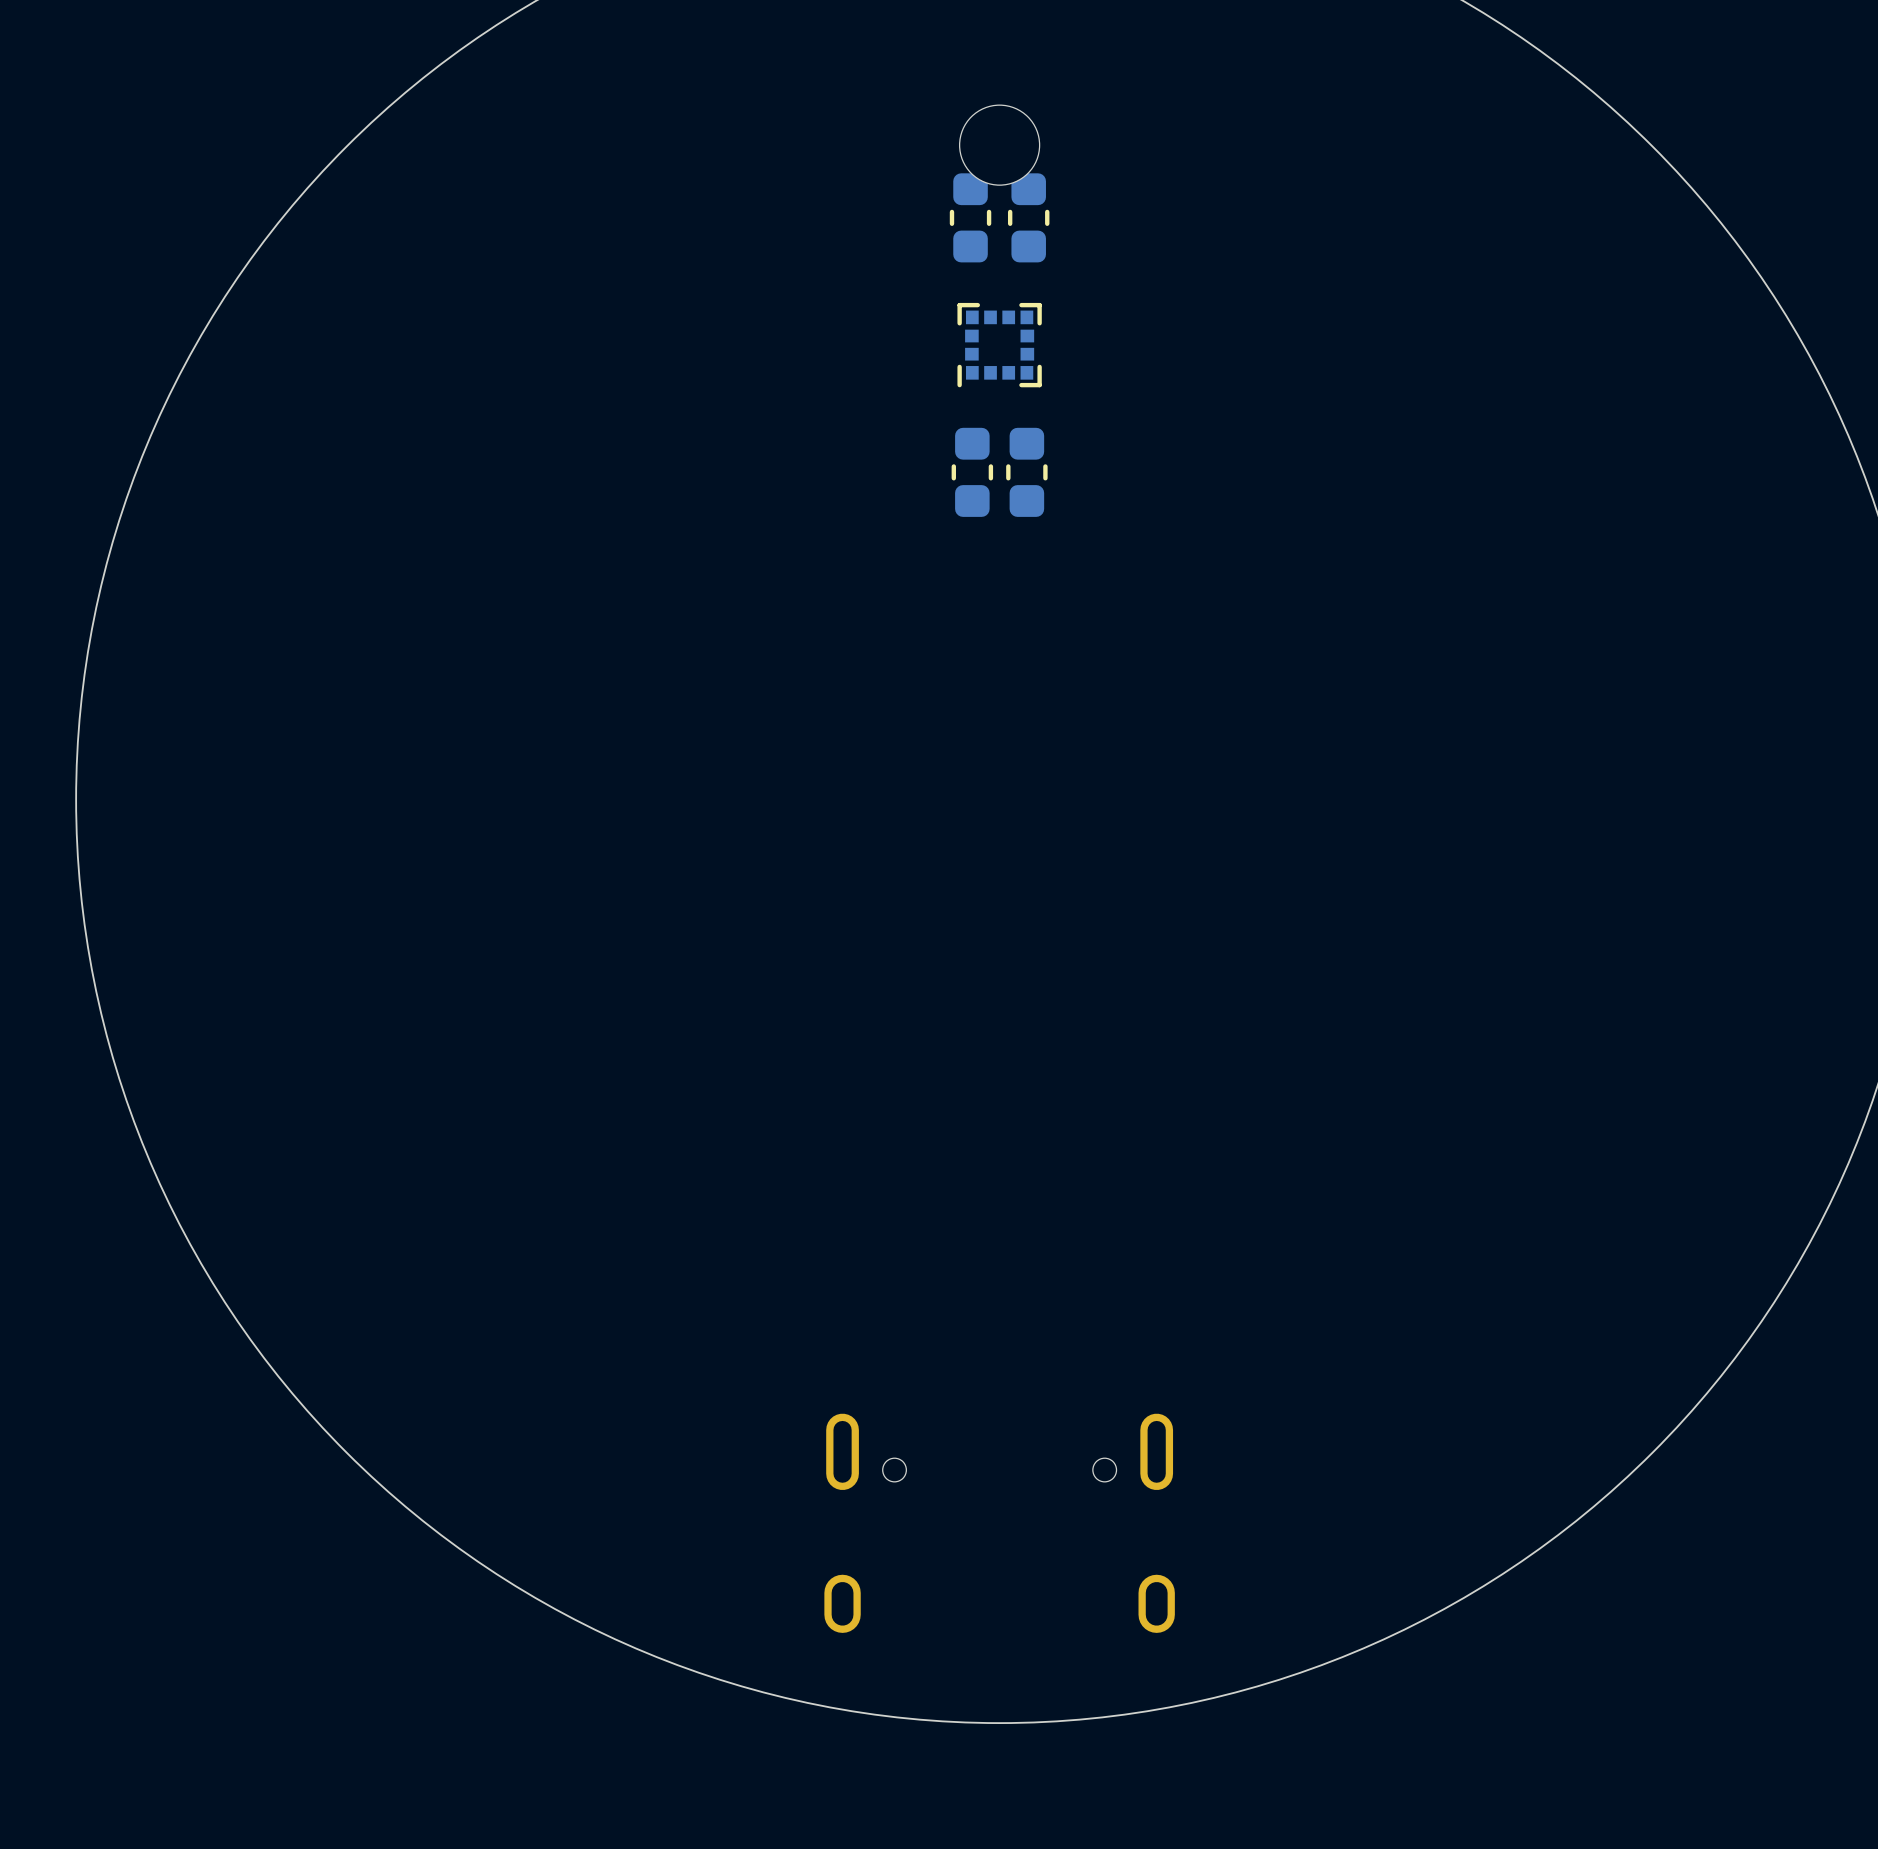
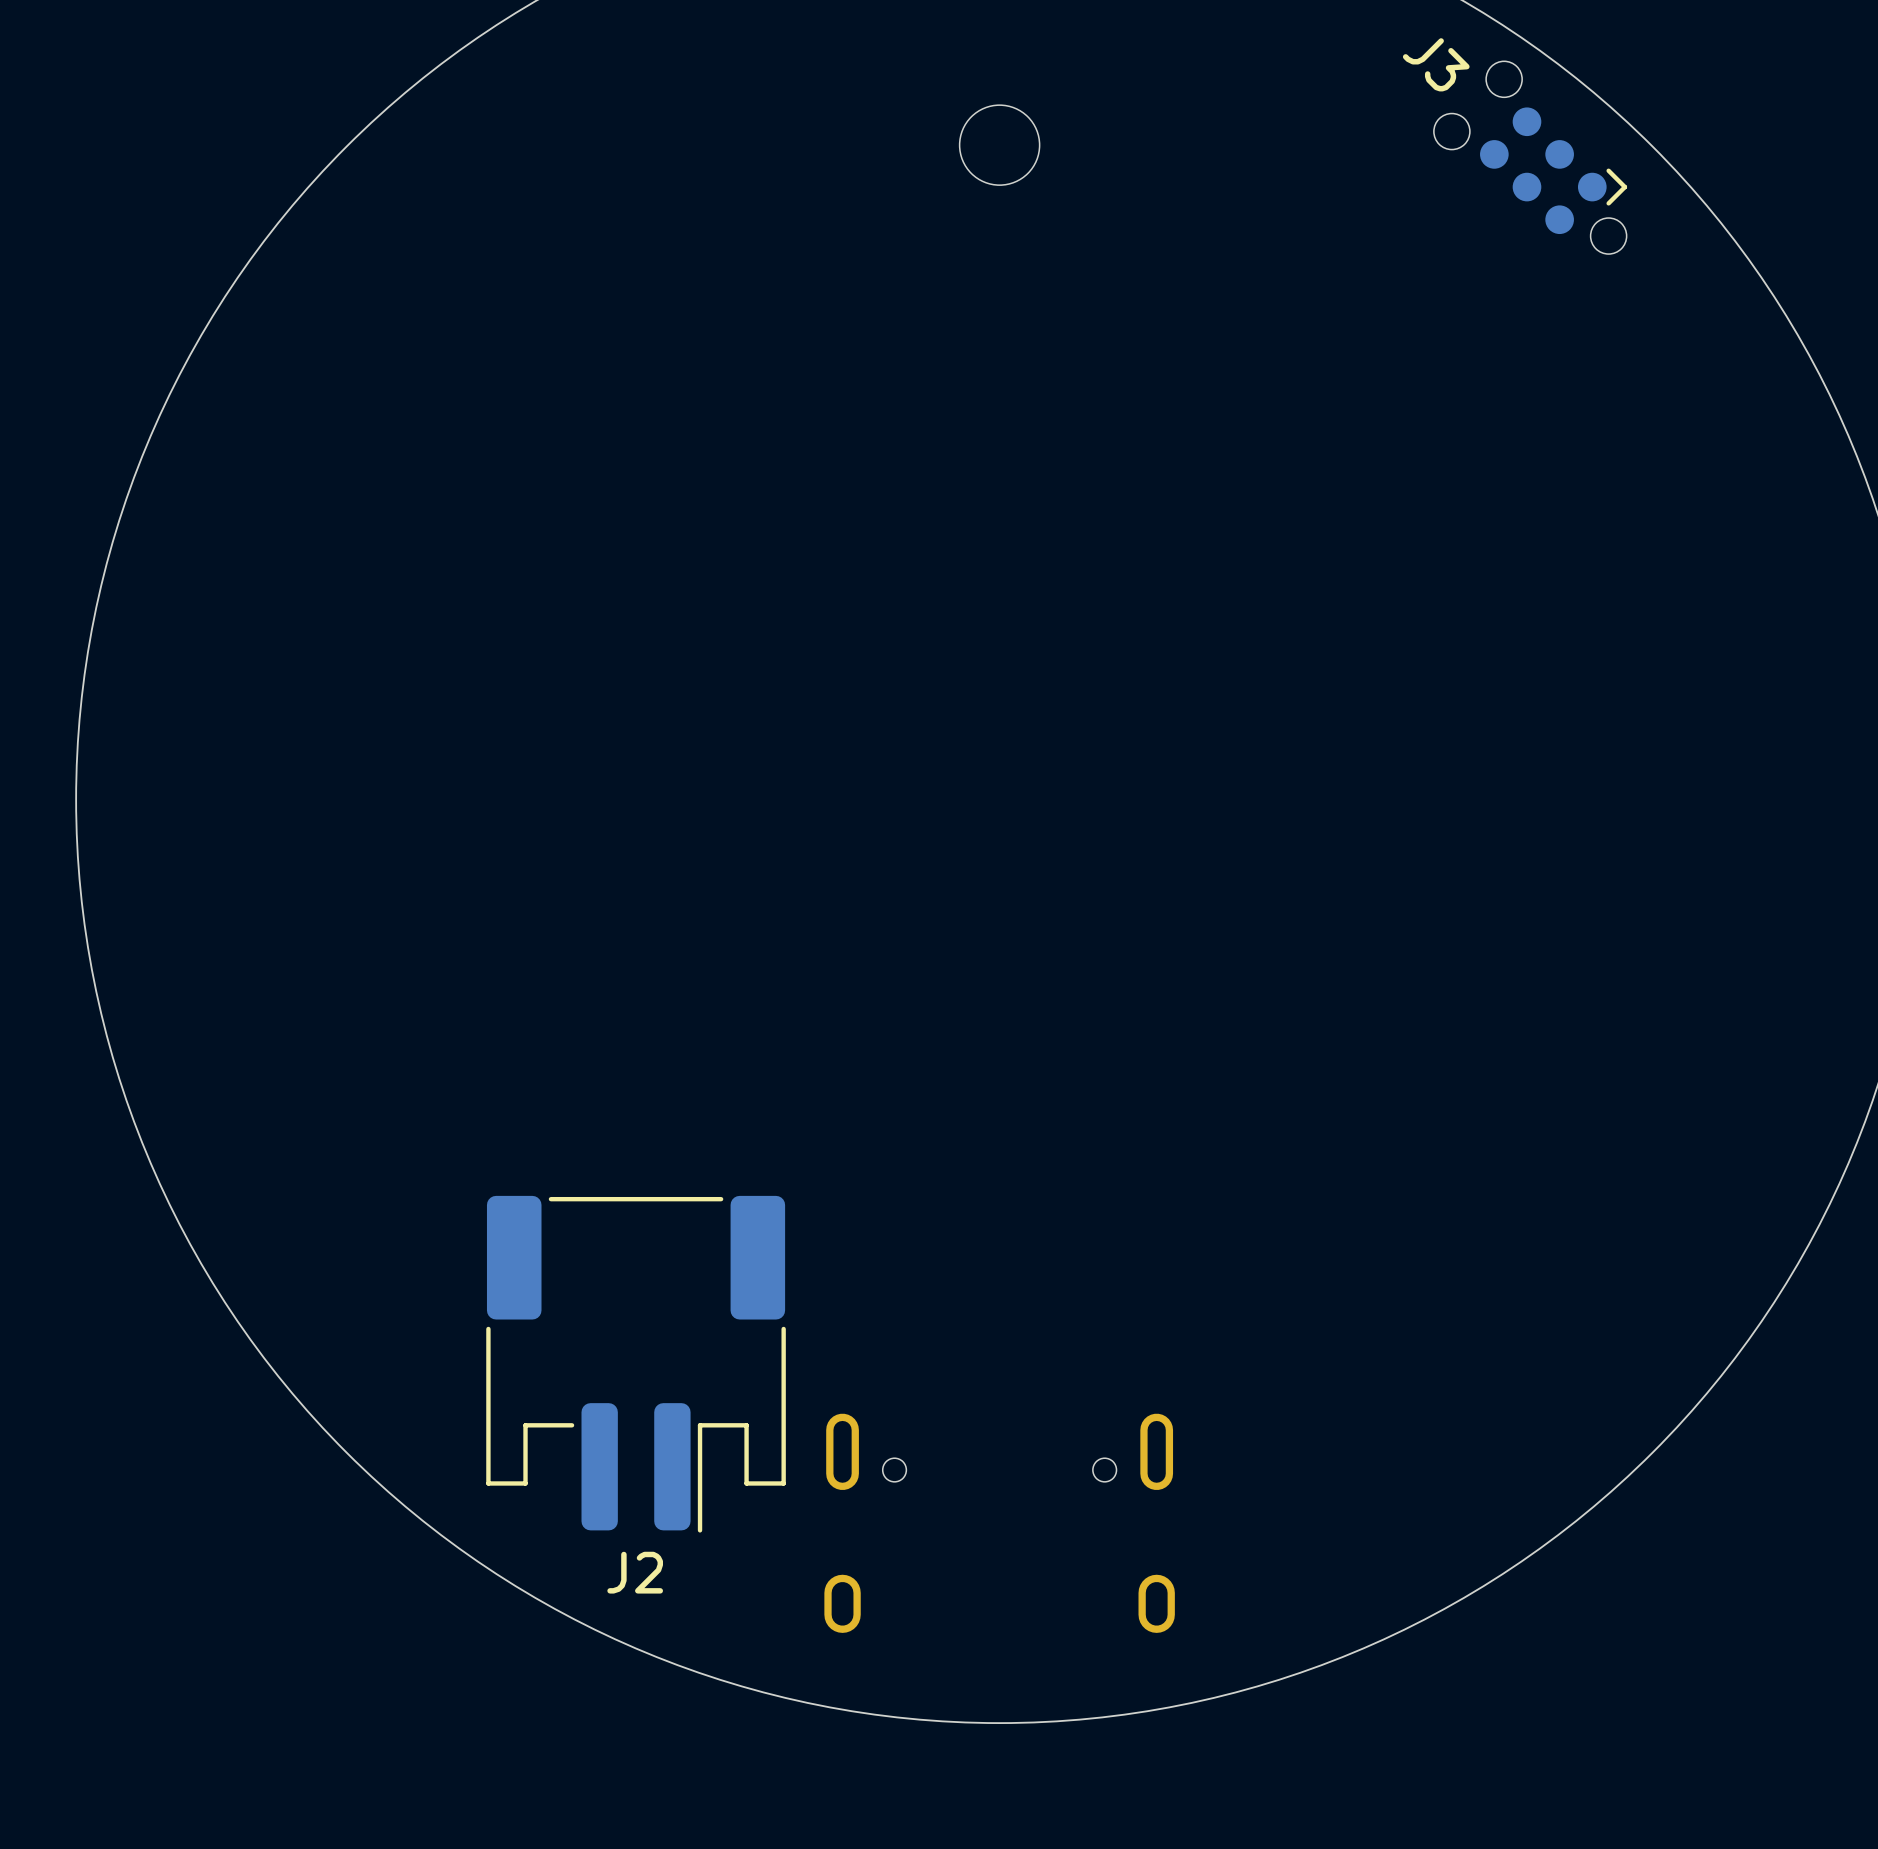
J3: none -> (1530, 157)
part: (970, 217) -> none
part: (1028, 217) -> none
part: (999, 345) -> none
part: (972, 472) -> none
part: (1026, 472) -> none
J2: none -> (636, 1364)

